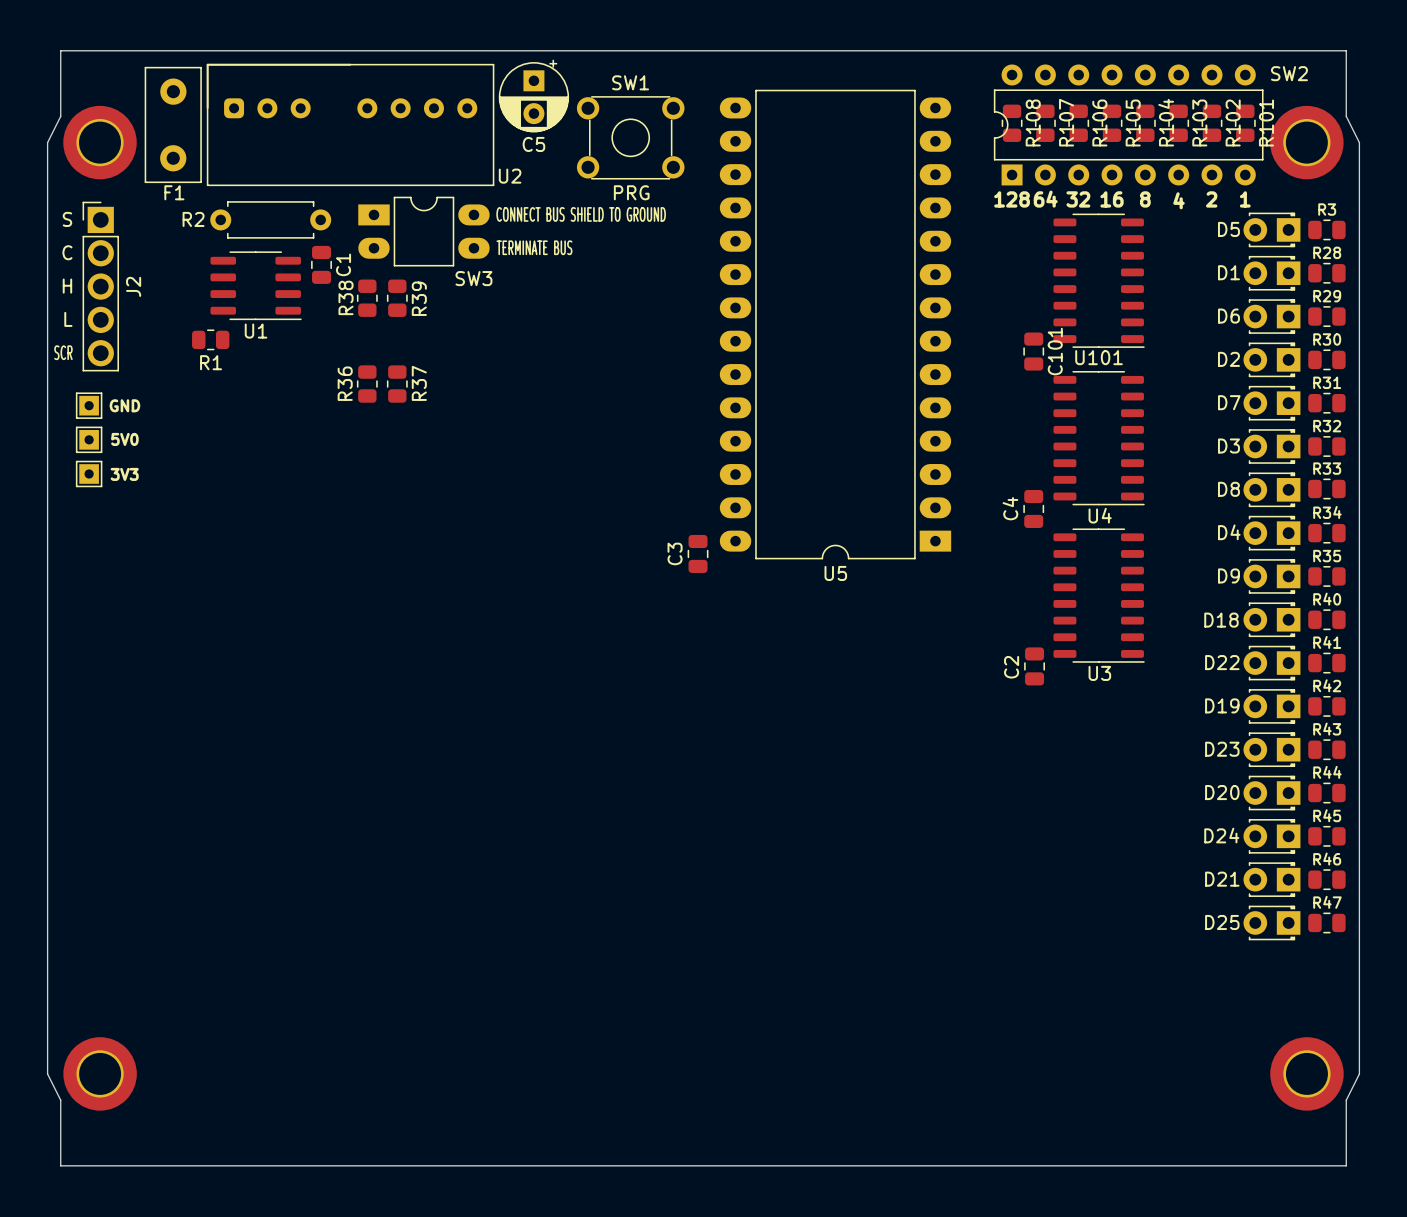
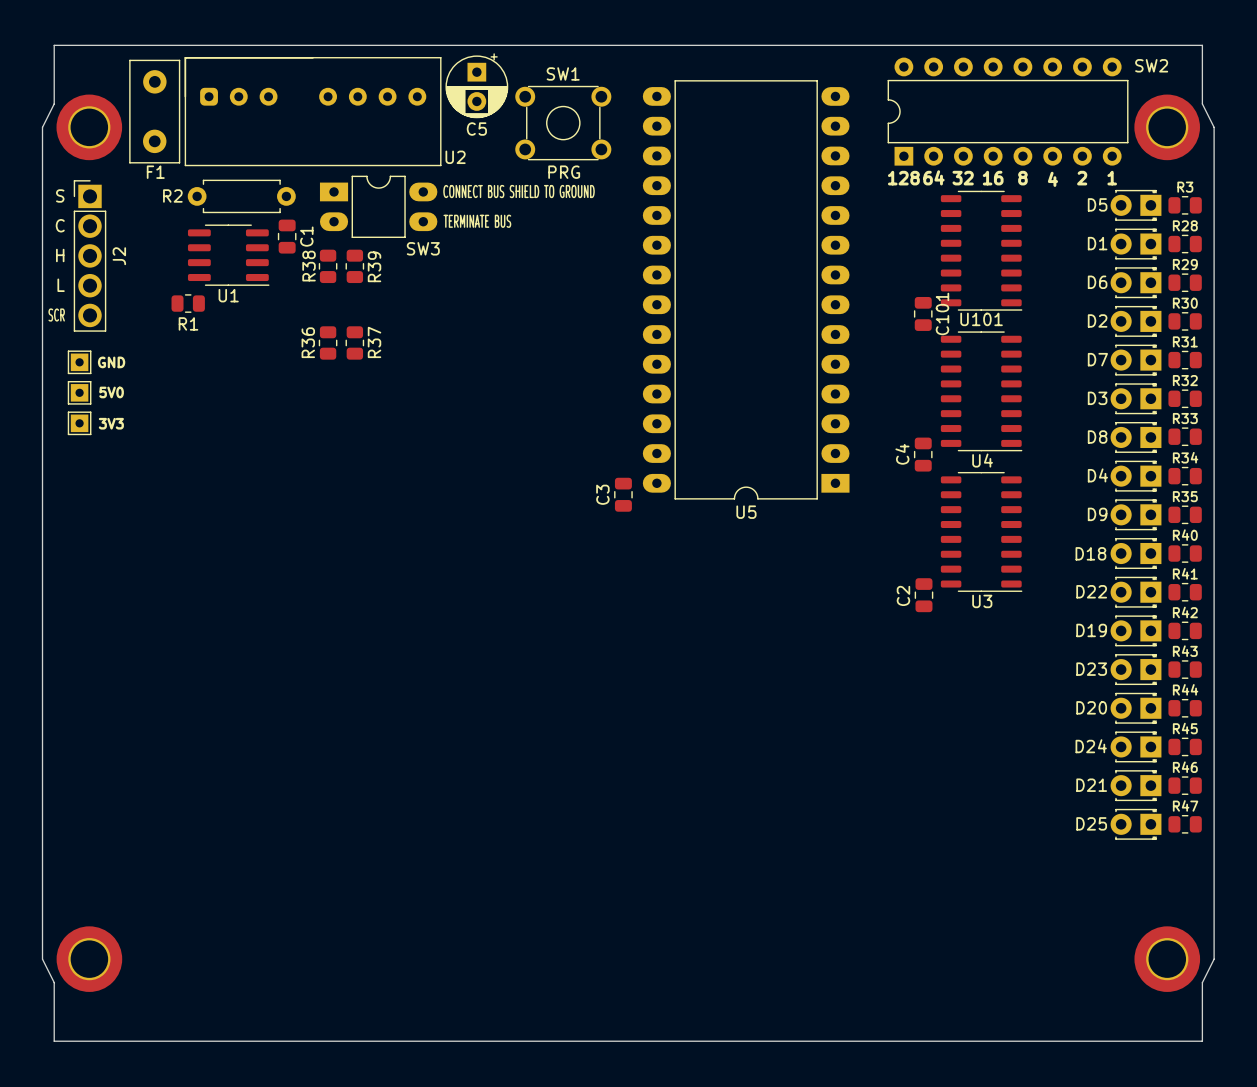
R108: (1012, 123) -> none
R107: (1045, 123) -> none
R106: (1078, 123) -> none
R105: (1112, 123) -> none
R104: (1145, 123) -> none
R103: (1178, 123) -> none
R102: (1211, 123) -> none
R101: (1245, 123) -> none

